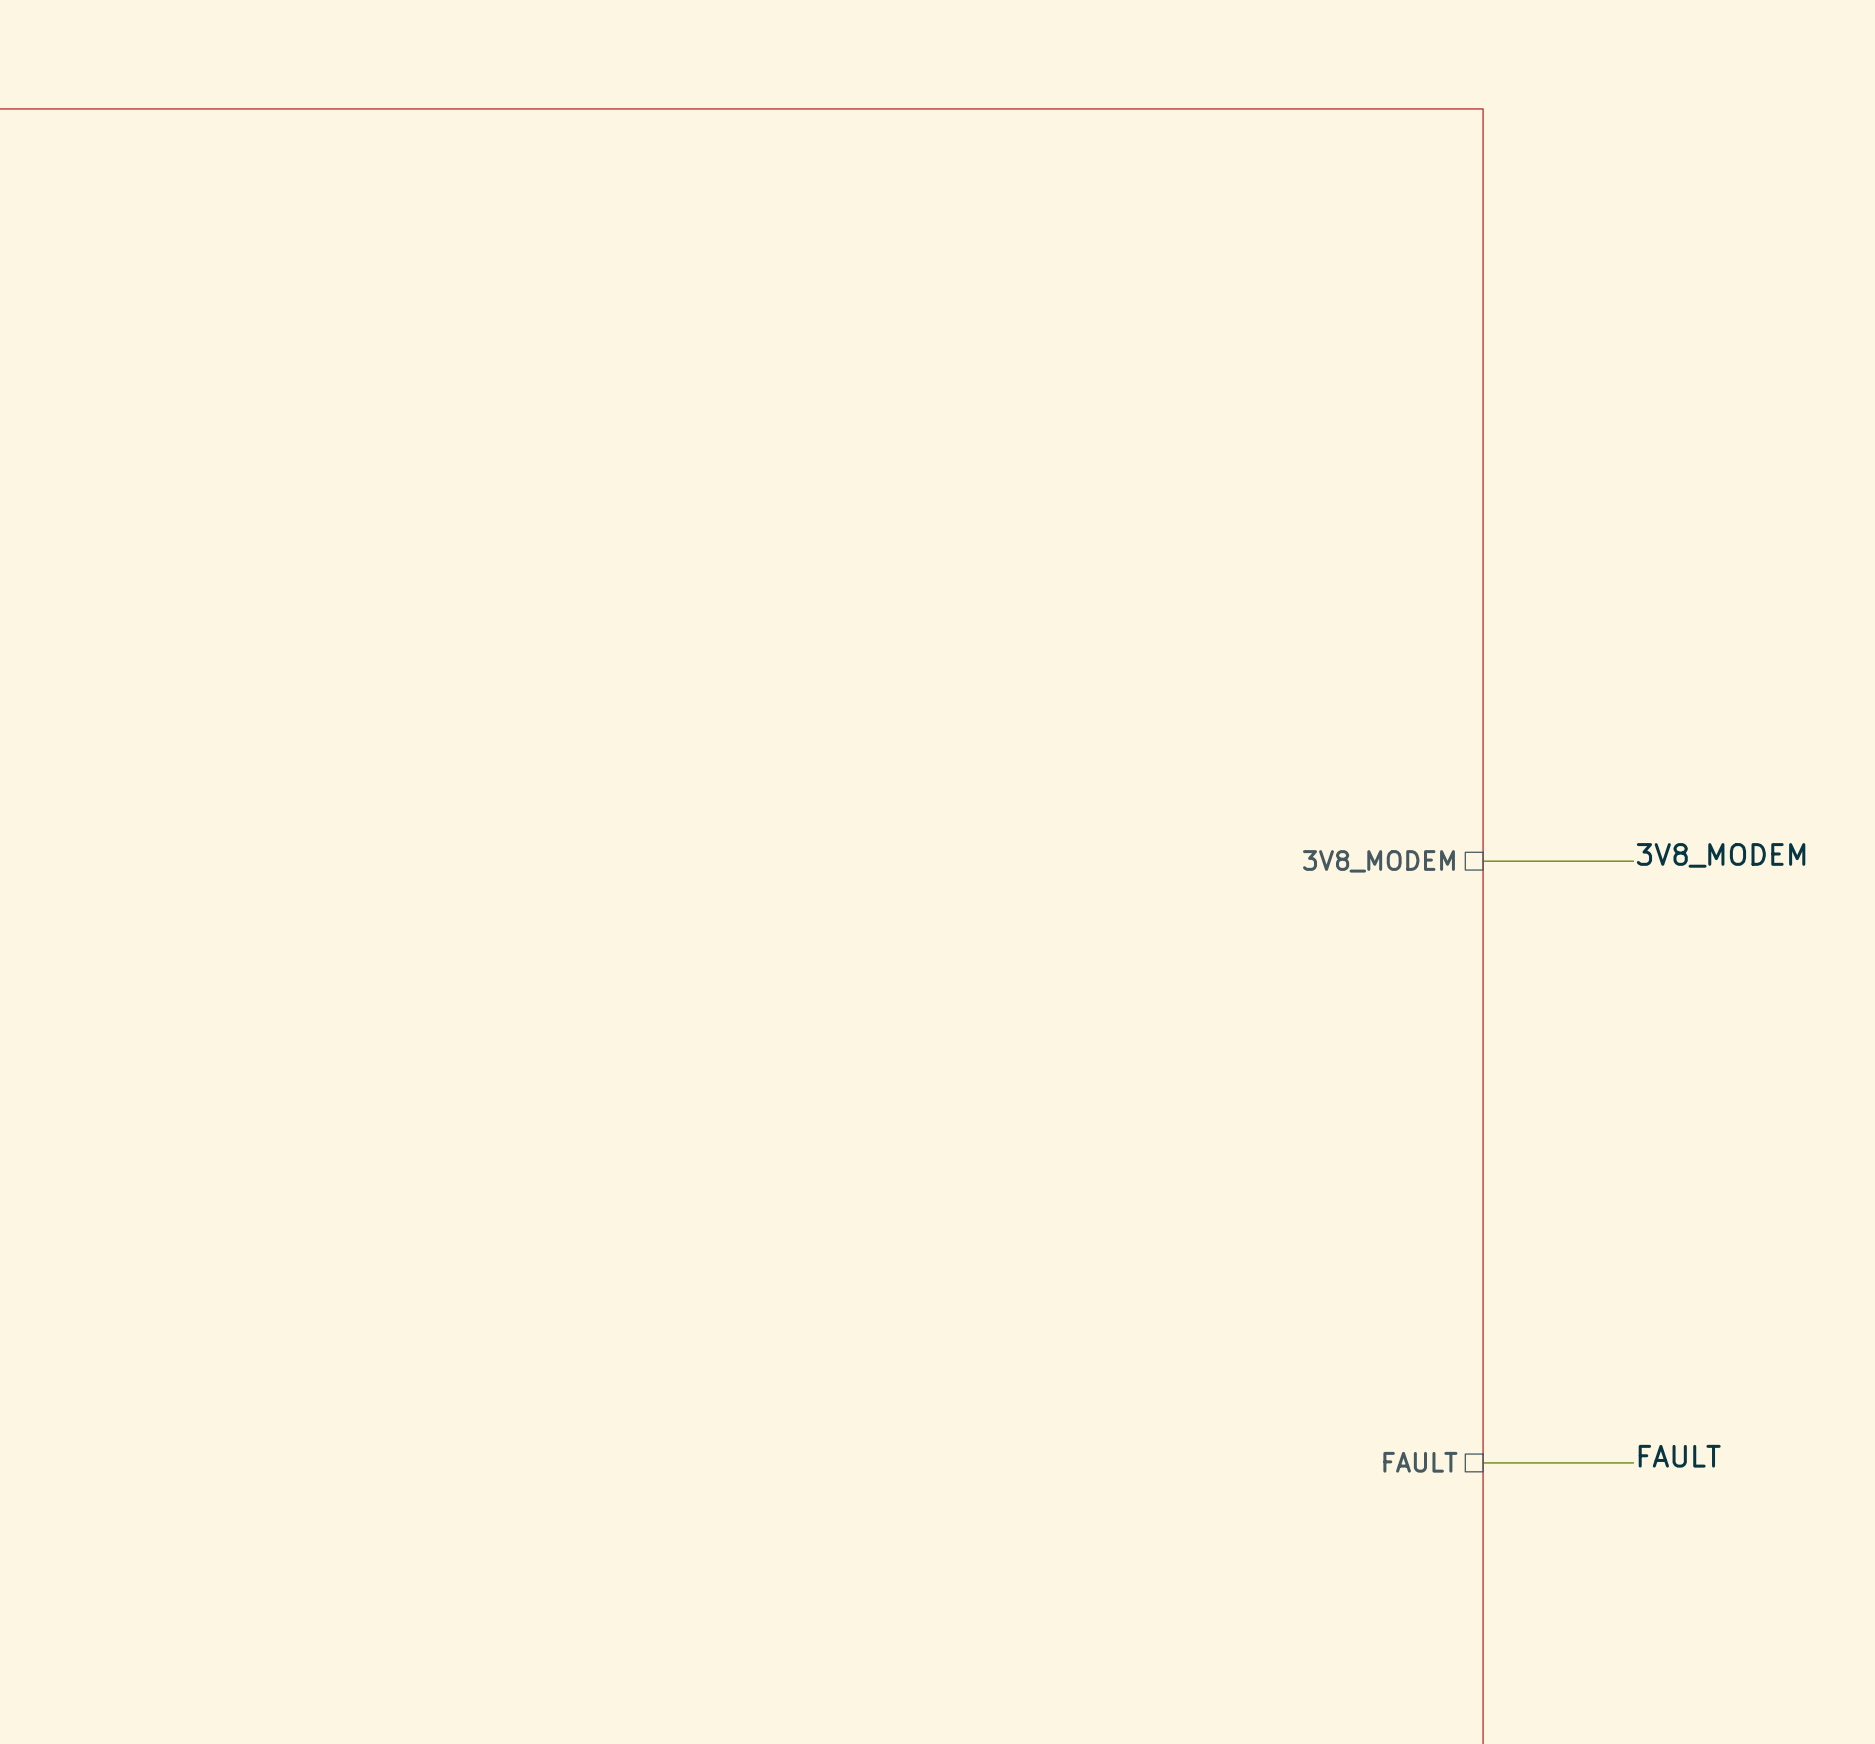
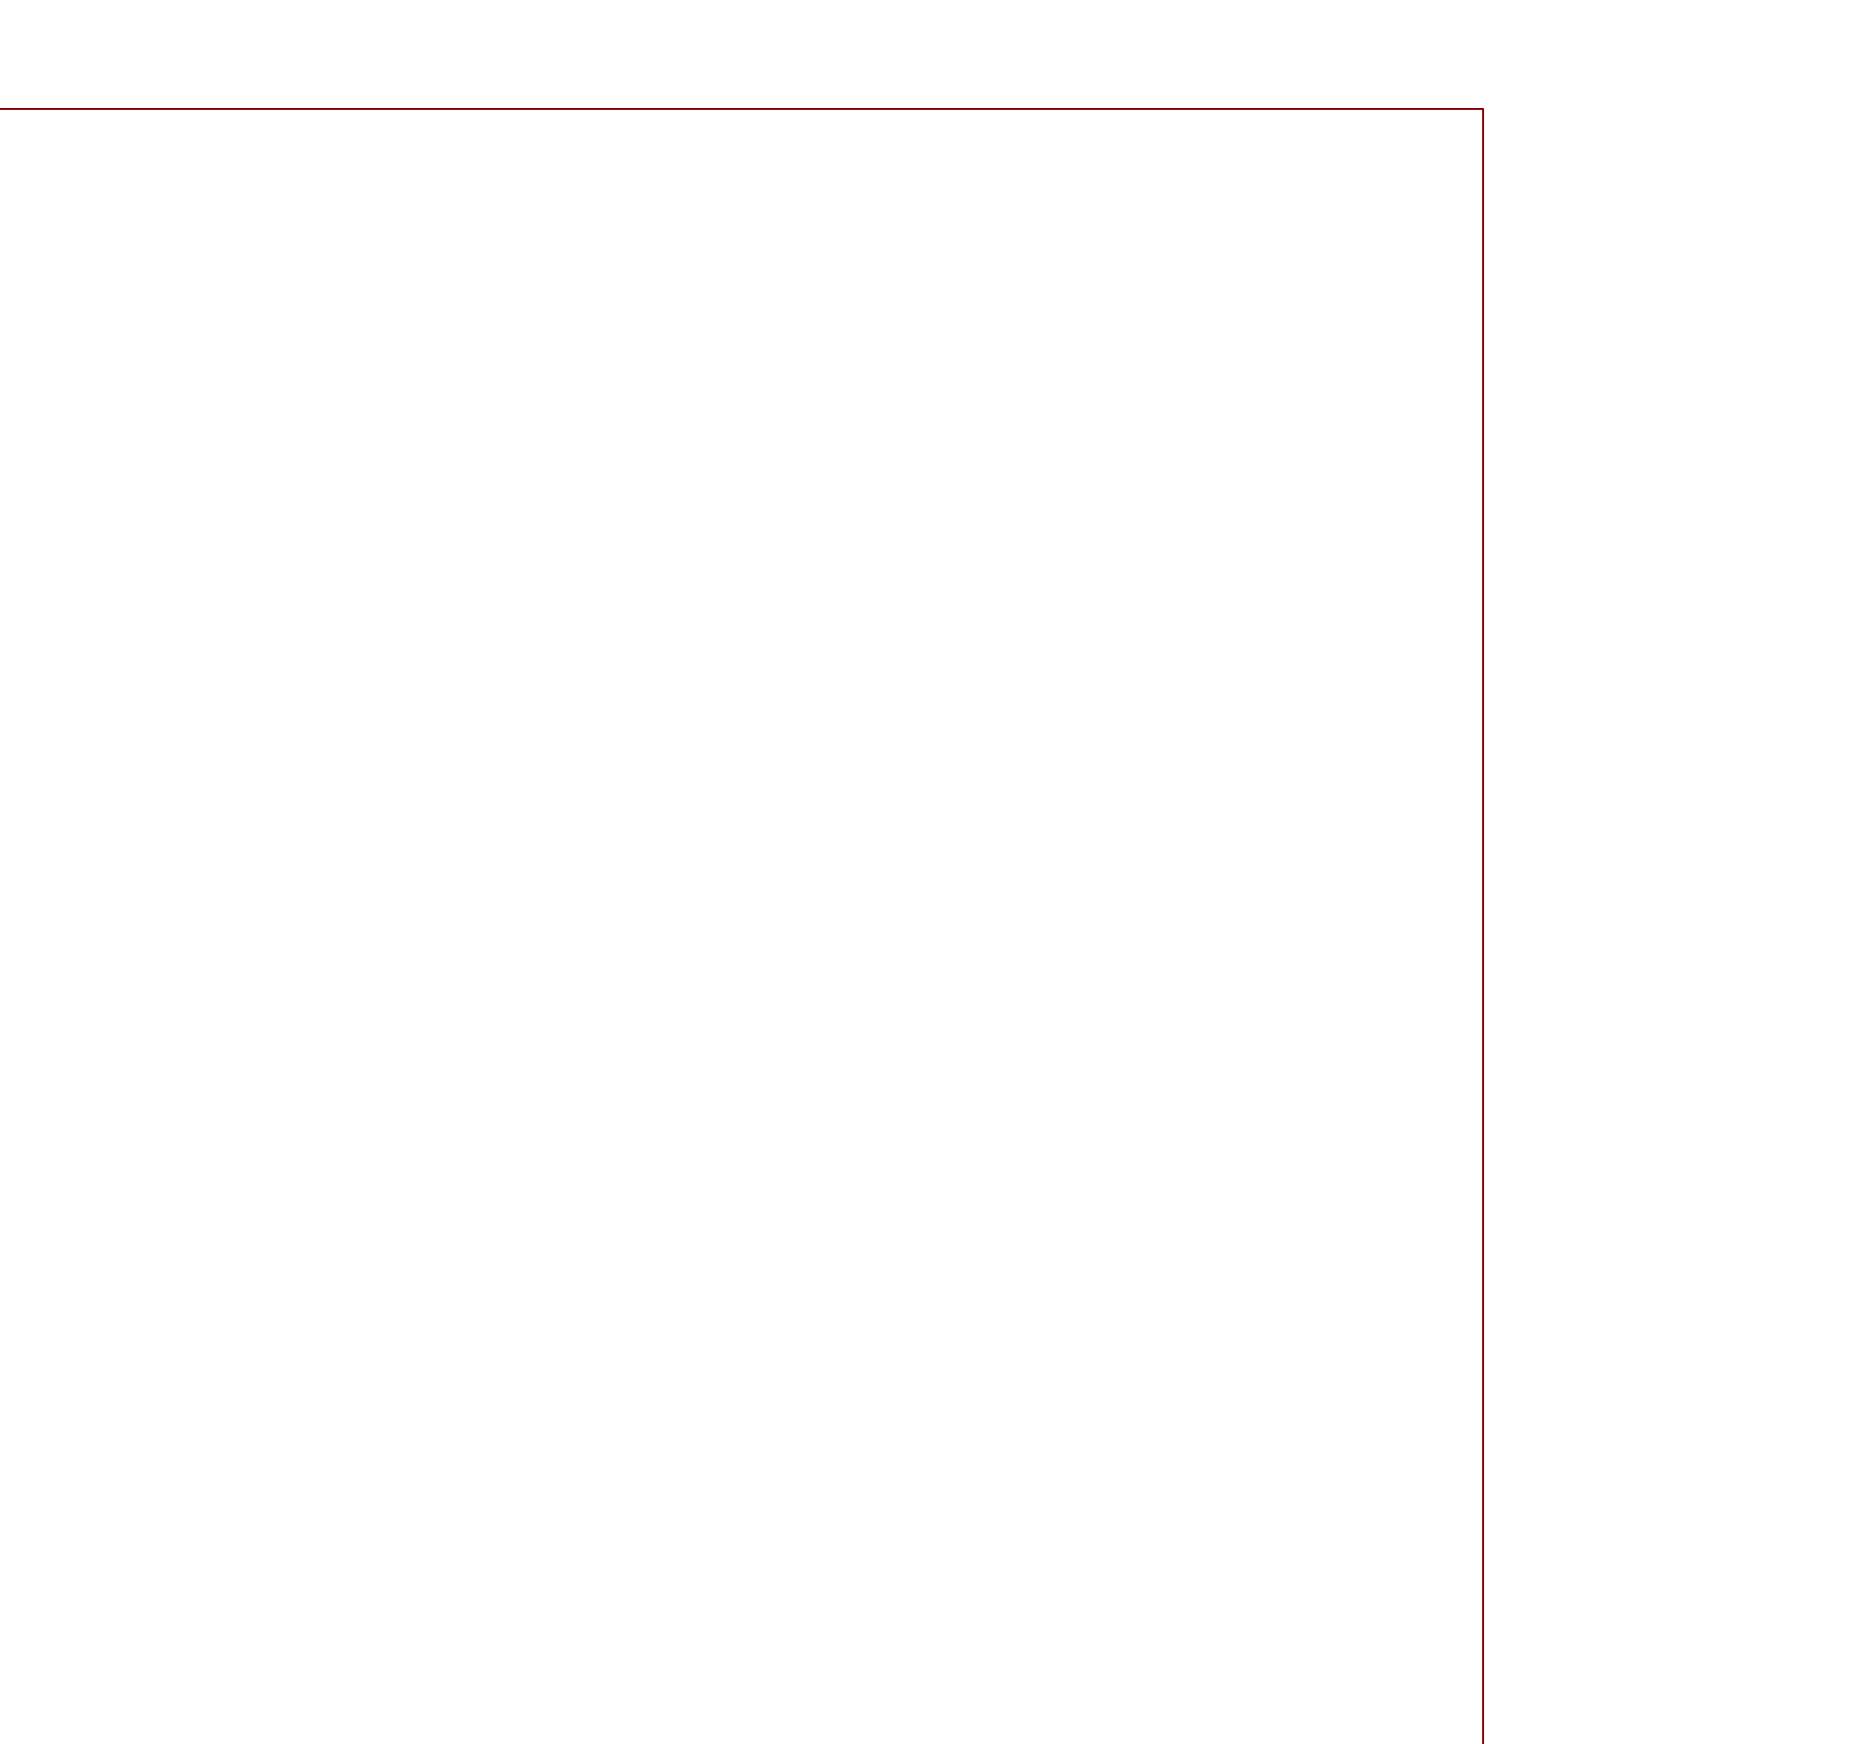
label: 3V8_MODEM (1721, 855) -> none
sheet pin: 3V8_MODEM (1378, 861) -> none
wire: (1483, 861) (1633, 861) -> none
label: FAULT (1679, 1456) -> none
sheet pin: FAULT (1420, 1462) -> none
wire: (1483, 1462) (1633, 1462) -> none

